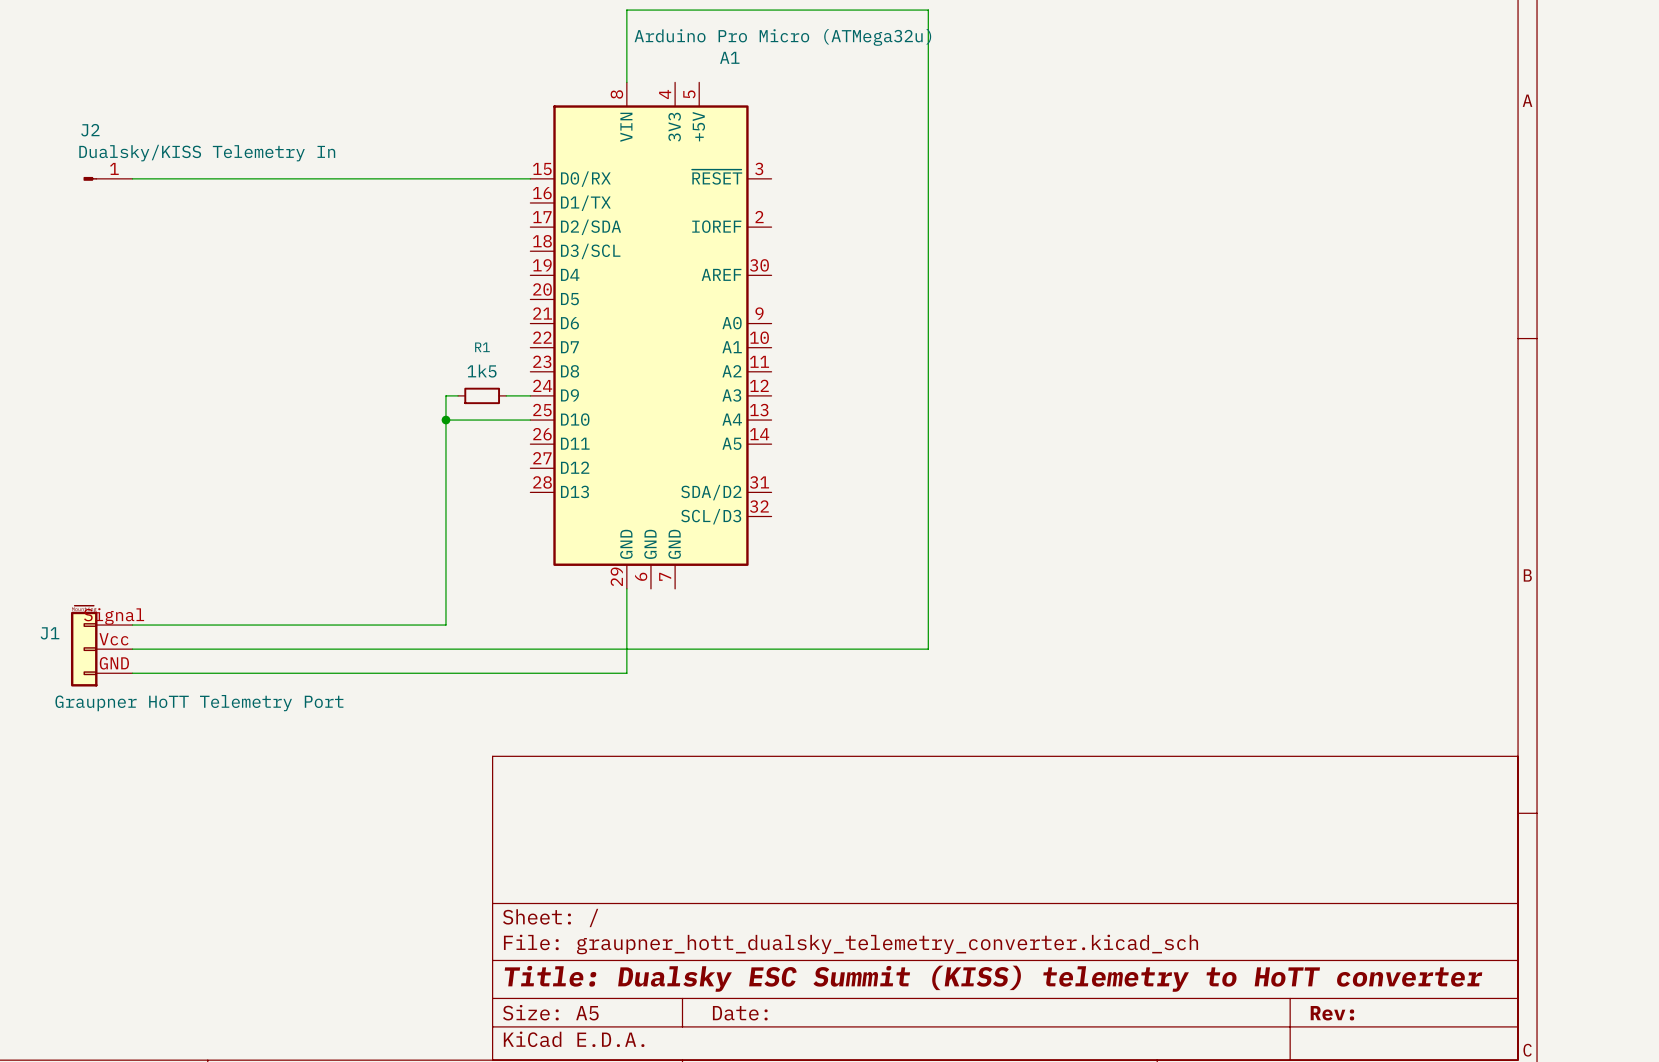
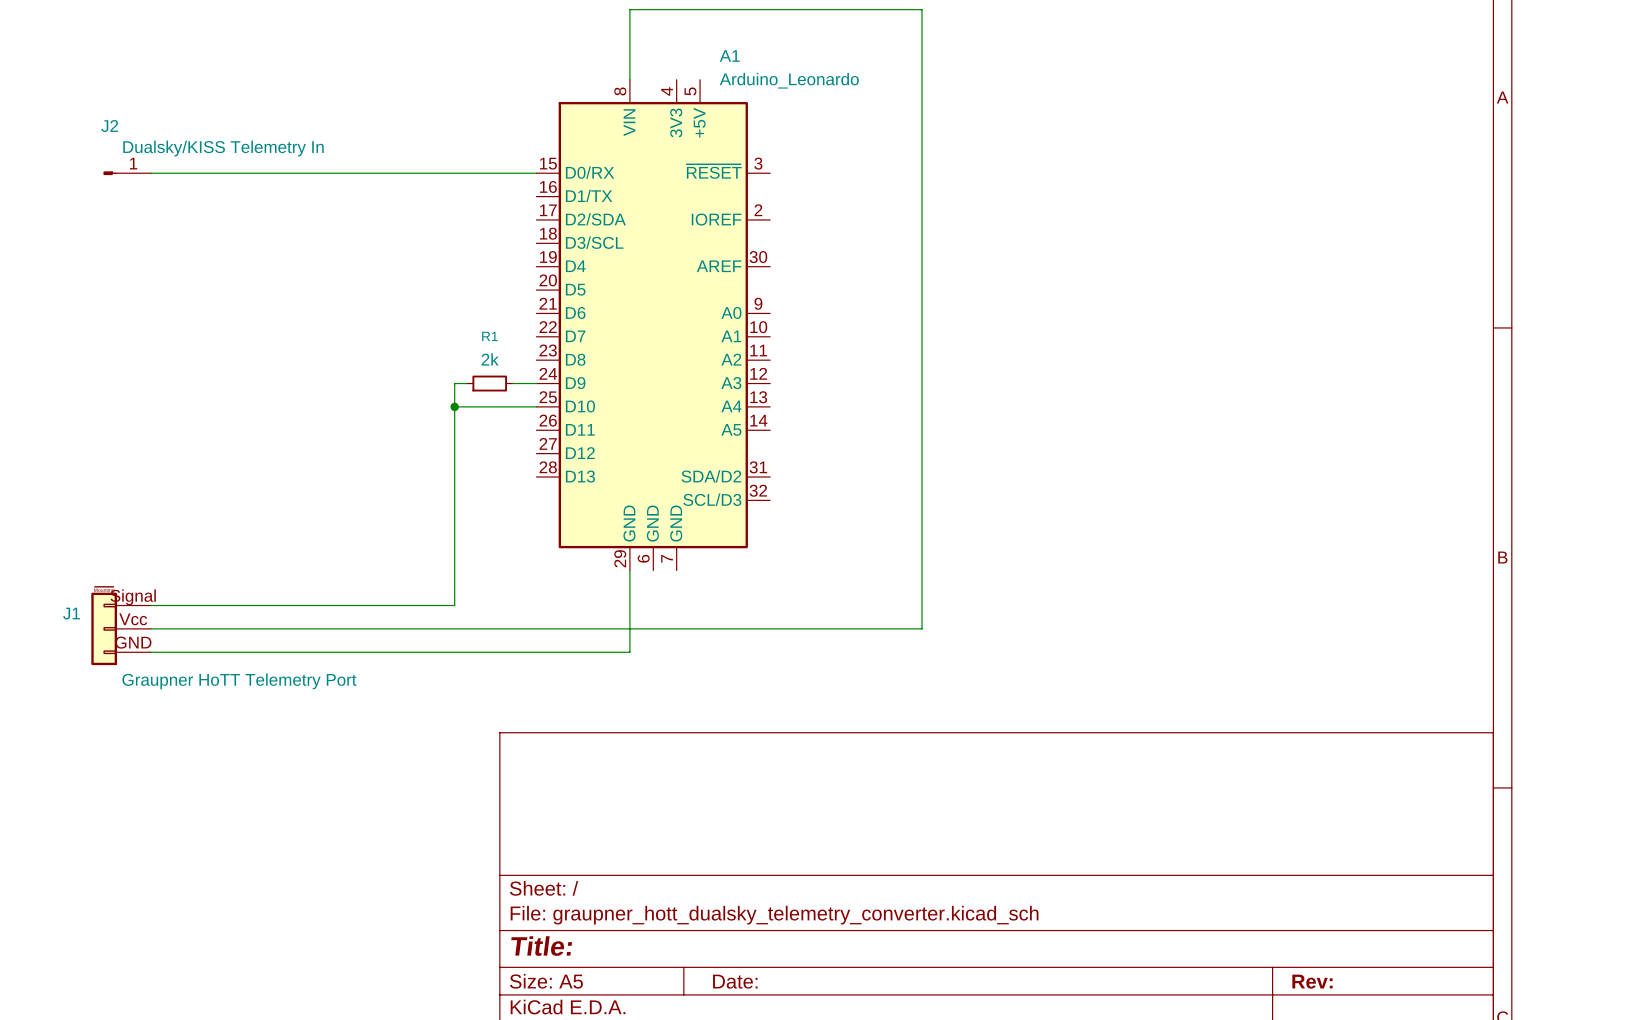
A1 value: Arduino Pro Micro (ATMega32u) (782, 37) -> Arduino_Leonardo (789, 80)
R1 value: 1k5 (482, 371) -> 2k (490, 359)
title block: Title: Dualsky ESC Summit (KISS) telemetry to HoTT converter (993, 978) -> Title: (541, 946)

